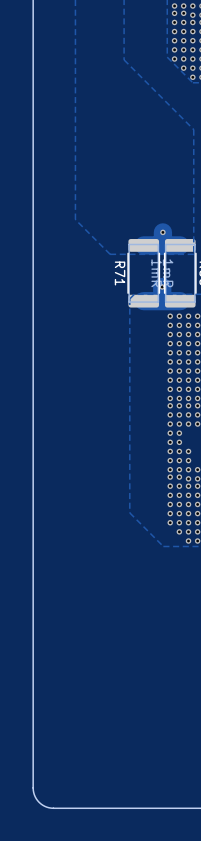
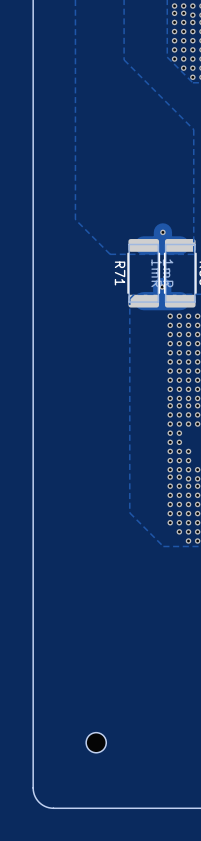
part: none -> (96, 742)

